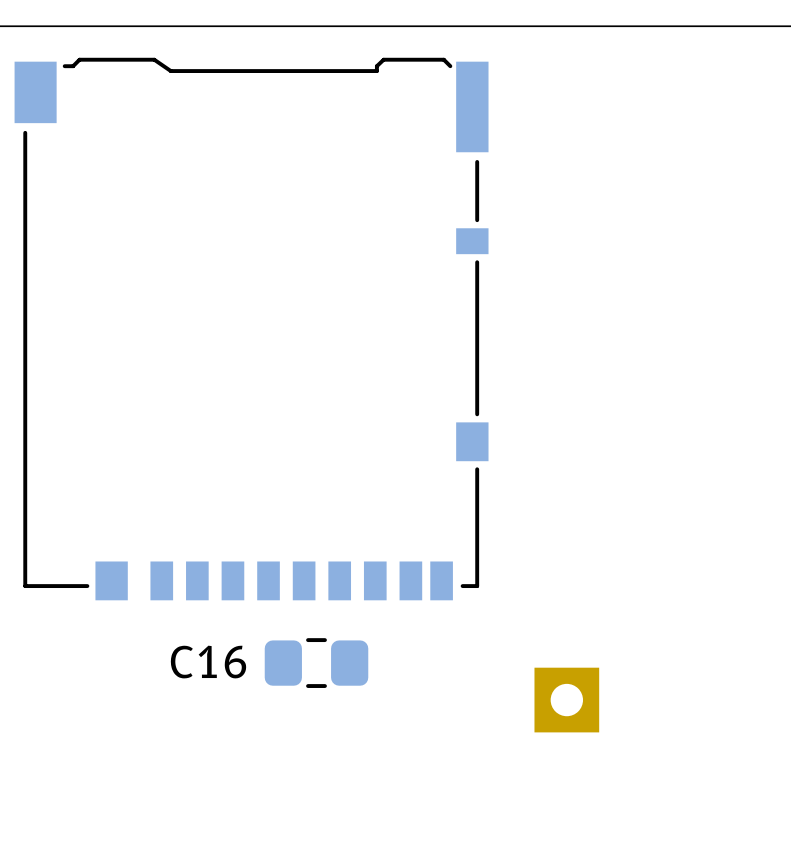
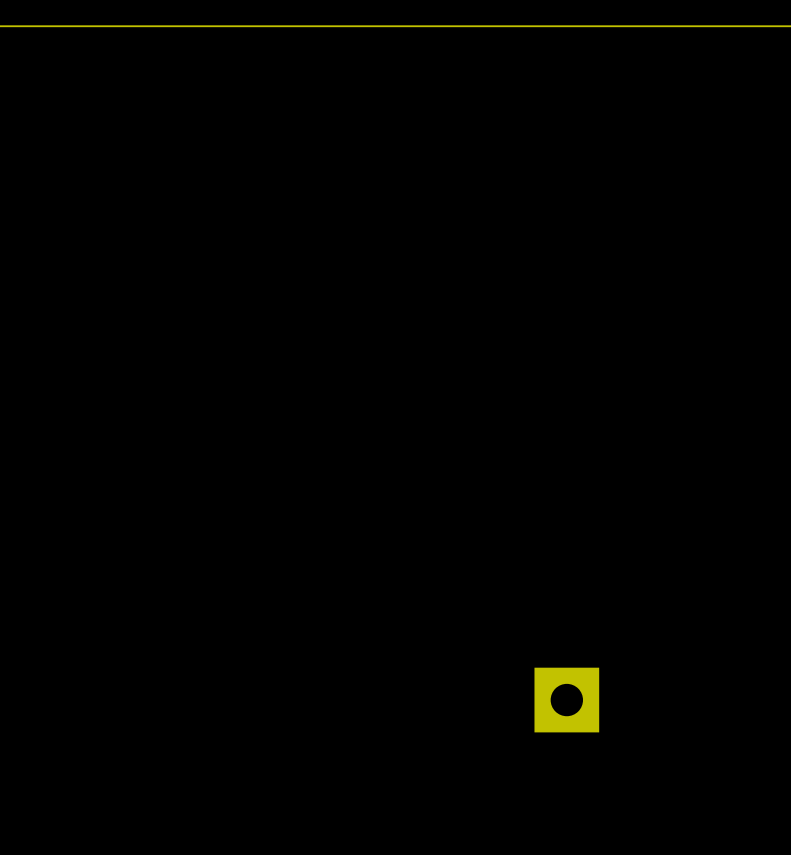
part: (251, 329) -> none
C16: (316, 663) -> none

